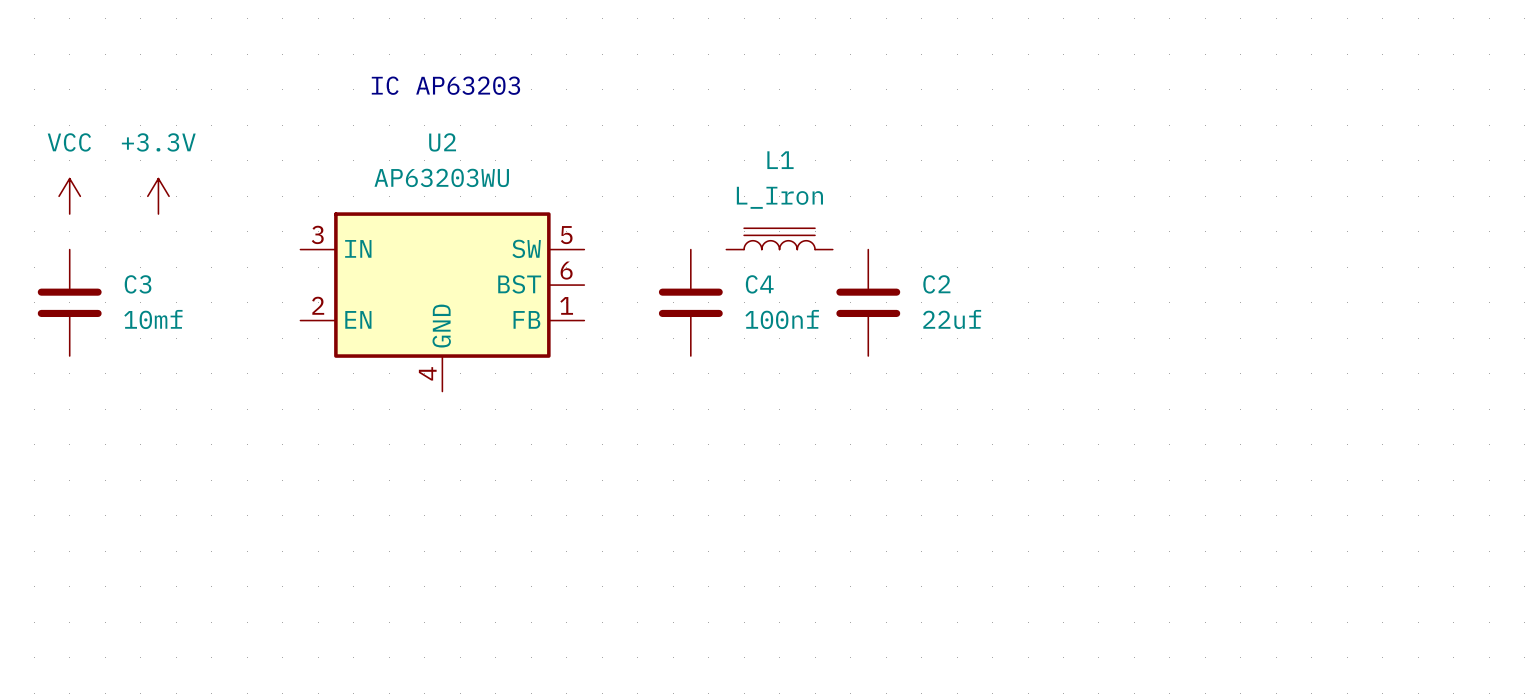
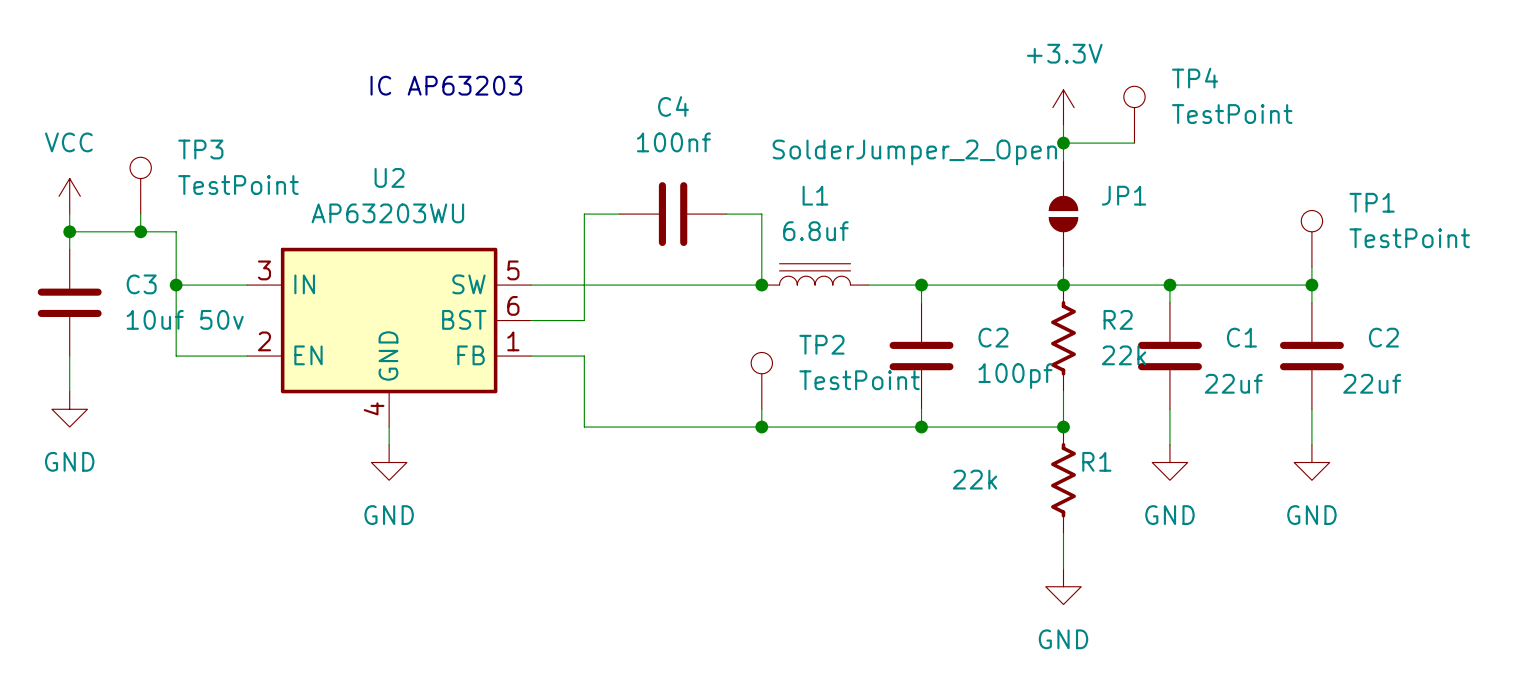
power symbol: none -> +3.3V (1063, 107)
TP4: none -> TestPoint (1134, 114)
wire: none -> (1063, 125) (1063, 160)
wire: none -> (1063, 143) (1134, 143)
junction: none -> (1063, 143)
TP3: none -> TestPoint (140, 185)
power symbol: +3.3V (158, 196) -> none
L1 value: L_Iron (779, 197) -> 6.8uf (815, 231)
wire: none -> (69, 214) (69, 249)
wire: none -> (140, 214) (140, 231)
wire: none -> (619, 214) (584, 214) (584, 320) (531, 320)
wire: none -> (726, 214) (761, 214) (761, 285) (531, 285)
JP1: none -> SolderJumper_2_Open (1063, 214)
wire: none -> (69, 231) (176, 231) (176, 356) (247, 356)
junction: none -> (69, 231)
junction: none -> (140, 231)
L1 position: (779, 238) -> (815, 274)
TP1: none -> TestPoint (1311, 238)
wire: none -> (1063, 267) (1063, 285)
wire: none -> (1311, 267) (1311, 302)
C4 name position: C4 (759, 284) -> C4 (673, 106)
wire: none -> (176, 285) (247, 285)
junction: none -> (176, 285)
junction: none -> (761, 285)
wire: none -> (868, 285) (1311, 285)
wire: none -> (921, 285) (921, 302)
junction: none -> (921, 285)
junction: none -> (1063, 285)
wire: none -> (1169, 285) (1169, 302)
junction: none -> (1169, 285)
junction: none -> (1311, 285)
U2 position: (442, 301) -> (389, 337)
C4 rotation: 0° (690, 302) -> 90° clockwise (673, 214)
C4 position: (690, 302) -> (673, 214)
C2: 22uf (868, 302) -> none
C3 value: 10mf (153, 319) -> 10uf 50v (185, 319)
C4 value position: 100nf (782, 319) -> 100nf (673, 142)
R2: none -> 22k (1063, 338)
wire: none -> (69, 356) (69, 391)
wire: none -> (531, 356) (584, 356) (584, 427) (1063, 427) (1063, 391)
C2: none -> 100pf (921, 356)
C1: none -> 22uf (1169, 356)
C2: none -> 22uf (1311, 356)
TP2: none -> TestPoint (761, 380)
power symbol: none -> GND (69, 409)
wire: none -> (761, 409) (761, 427)
wire: none -> (921, 409) (921, 427)
wire: none -> (1169, 409) (1169, 444)
wire: none -> (1311, 409) (1311, 444)
wire: none -> (389, 427) (389, 444)
junction: none -> (761, 427)
junction: none -> (921, 427)
junction: none -> (1063, 427)
power symbol: none -> GND (389, 462)
power symbol: none -> GND (1169, 462)
power symbol: none -> GND (1311, 462)
R1: none -> 22k (1063, 480)
wire: none -> (1063, 533) (1063, 568)
power symbol: none -> GND (1063, 586)

